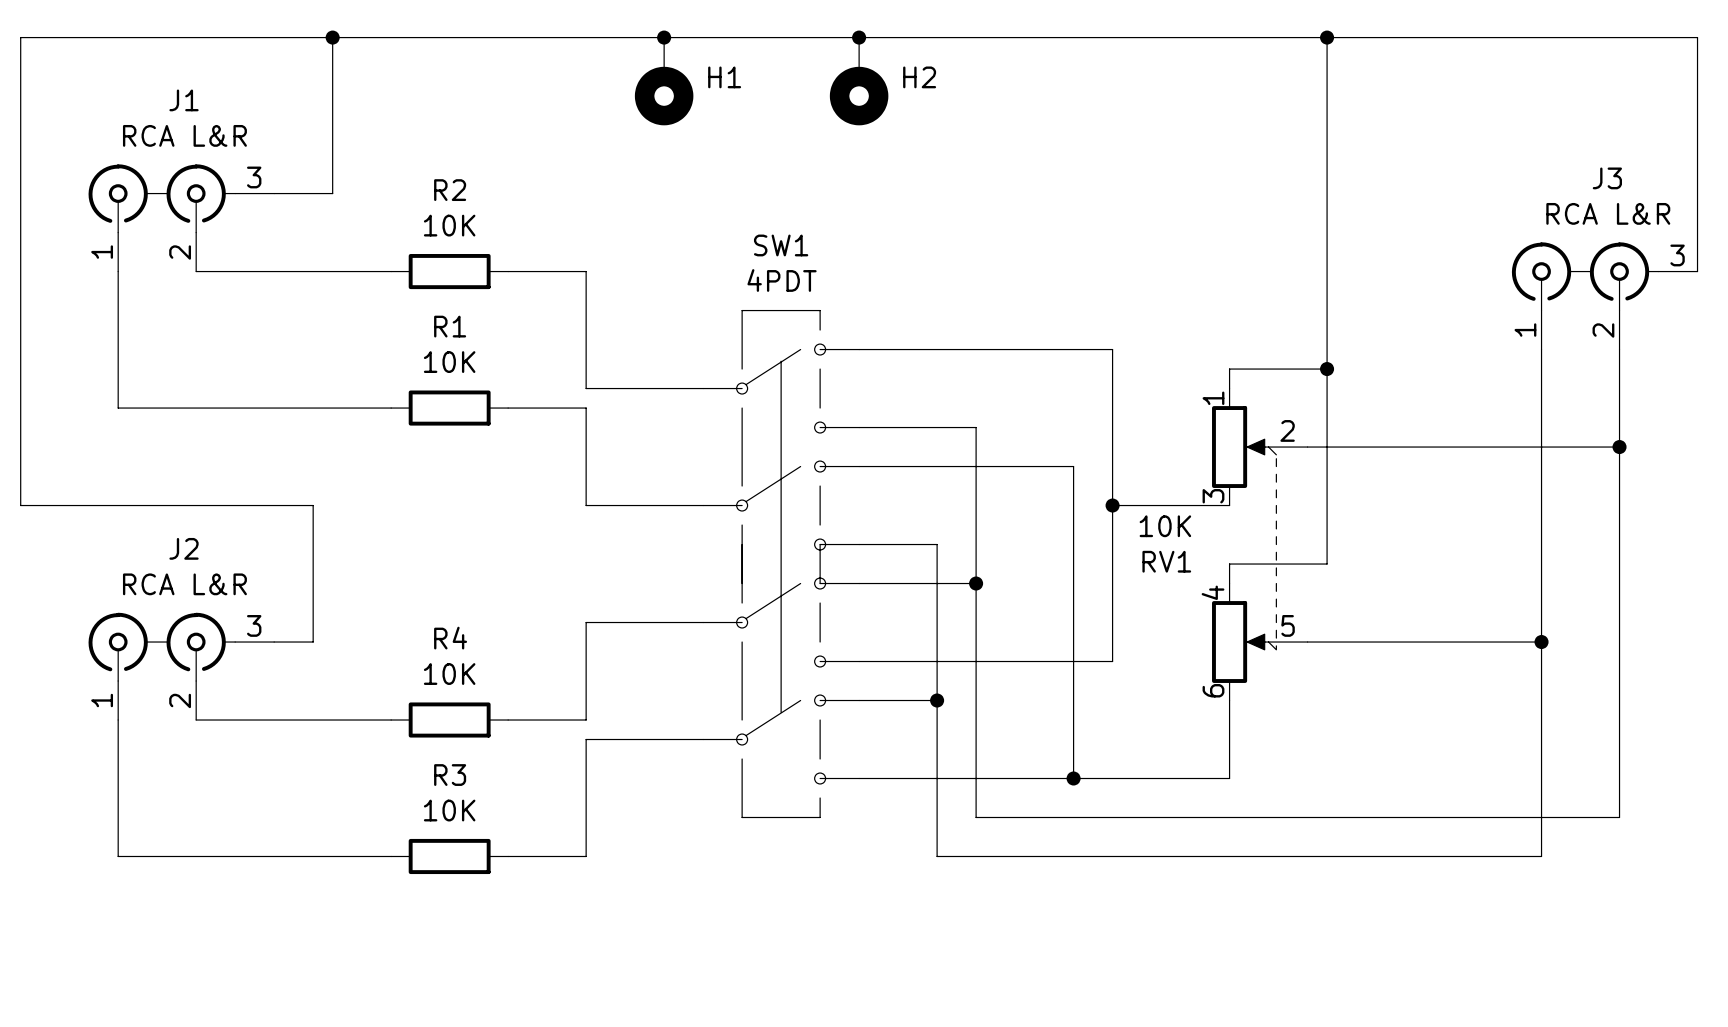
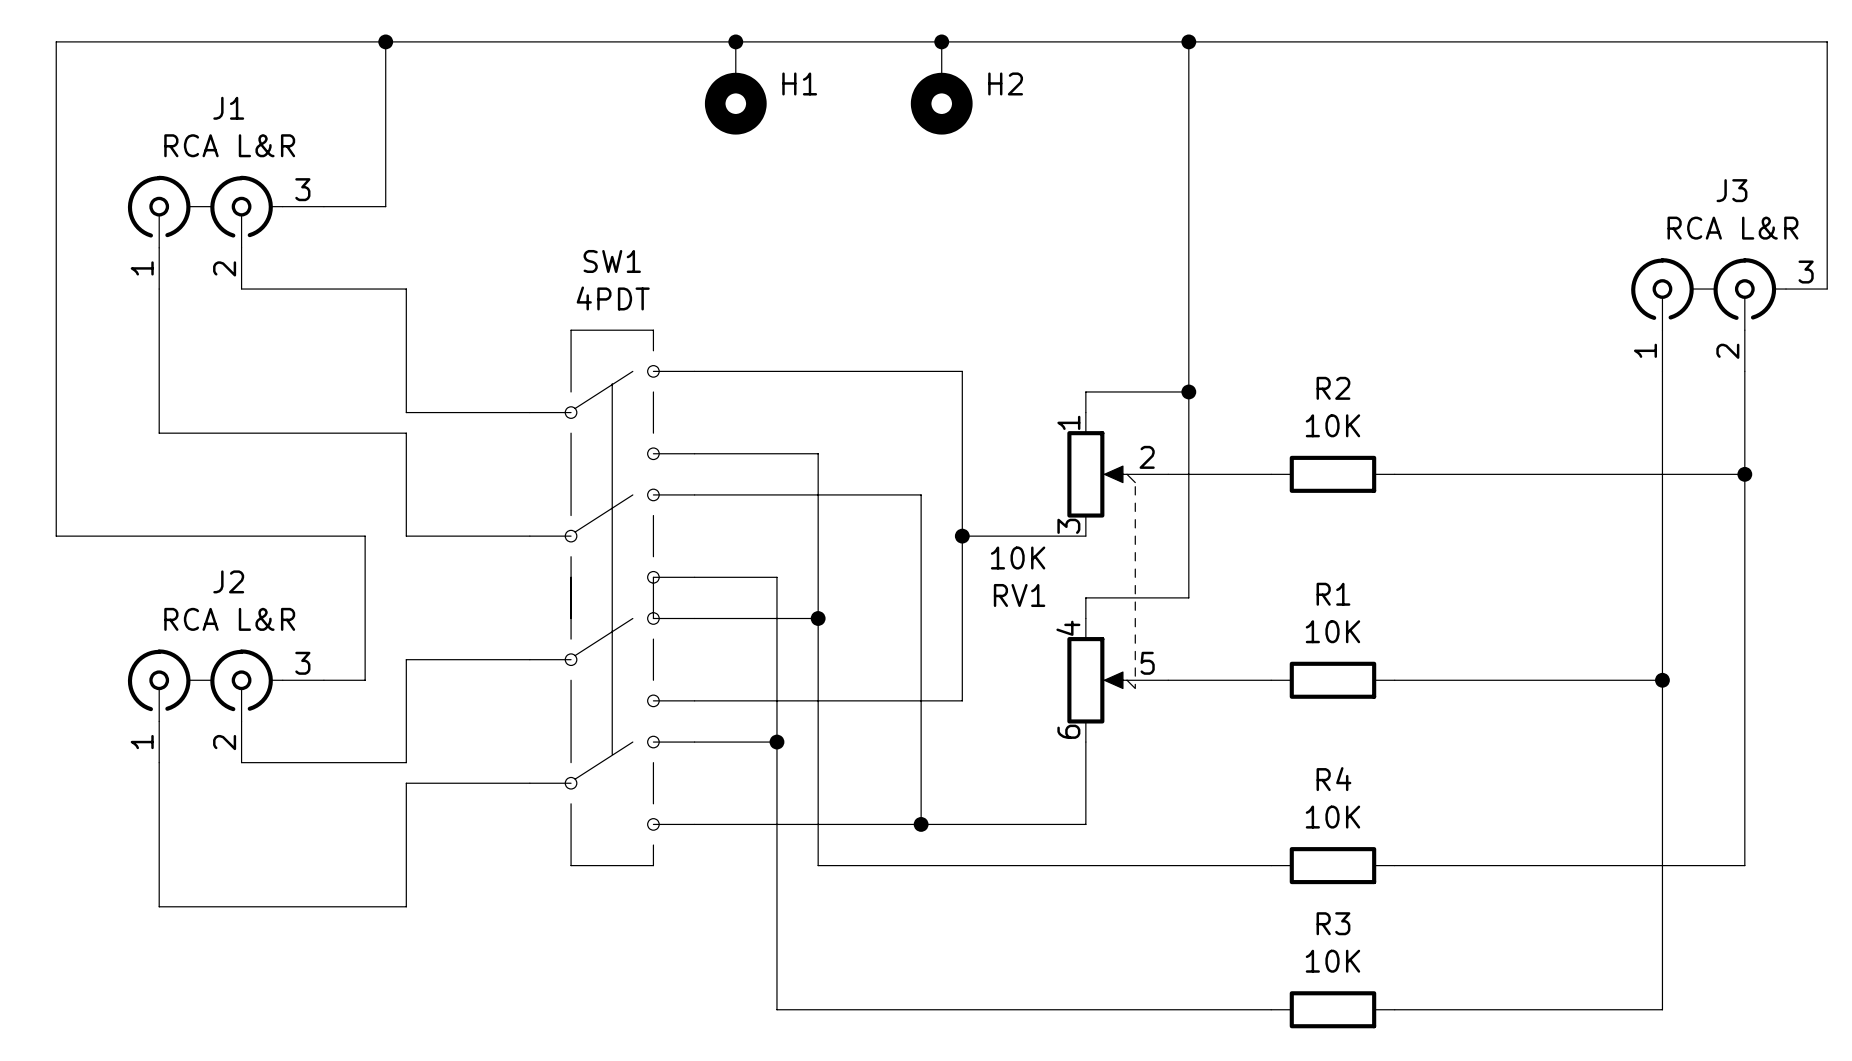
junction: none -> (1188, 41)
wire: (1327, 37) (1327, 564) (1229, 564) (1229, 583) -> (1188, 41) (1188, 597) (1085, 597) (1085, 618)
junction: (1327, 37) -> none
wire: (352, 271) (391, 271) -> (406, 289) (406, 412) (529, 412)
R2 position: (449, 271) -> (1332, 474)
wire: (508, 271) (586, 271) (586, 388) (703, 388) -> none
wire: none -> (694, 371) (941, 371)
wire: (878, 349) (1112, 349) (1112, 661) (878, 661) -> (962, 371) (962, 700)
junction: none -> (1188, 391)
wire: (1327, 369) (1229, 369) (1229, 388) -> (1188, 391) (1085, 391) (1085, 412)
junction: (1327, 369) -> none
wire: (352, 408) (391, 408) -> (406, 433) (406, 536) (529, 536)
R1 position: (449, 408) -> (1332, 680)
wire: (508, 408) (586, 408) (586, 505) (703, 505) -> none
wire: (859, 427) (976, 427) (976, 817) -> (694, 453) (818, 453) (818, 865) (1065, 865)
wire: none -> (1168, 474) (1271, 474)
wire: (859, 466) (1073, 466) (1073, 778) -> (694, 494) (921, 494) (921, 824)
junction: none -> (962, 536)
wire: (1112, 505) (1229, 505) -> (962, 536) (1085, 536)
junction: (1112, 505) -> none
wire: none -> (694, 577) (776, 577) (776, 1009) (1271, 1009)
wire: (859, 544) (937, 544) (937, 856) (1541, 856) -> (1394, 1009) (1662, 1009) (1662, 906)
RV1 position: (1259, 544) -> (1117, 577)
SW1 position: (781, 564) -> (612, 597)
junction: none -> (818, 618)
wire: (859, 583) (976, 583) -> (694, 618) (818, 618)
junction: (976, 583) -> none
wire: (703, 622) (586, 622) (586, 720) (508, 720) -> none
wire: none -> (1168, 680) (1271, 680)
wire: none -> (694, 700) (941, 700)
junction: none -> (776, 742)
wire: (859, 700) (937, 700) -> (694, 742) (776, 742)
junction: (937, 700) -> none
wire: (1229, 700) (1229, 778) (995, 778) -> (1085, 742) (1085, 824)
wire: (352, 720) (391, 720) -> (406, 762) (406, 659) (529, 659)
R4 position: (449, 720) -> (1332, 865)
wire: (703, 739) (586, 739) (586, 856) (508, 856) -> none
wire: none -> (694, 824) (941, 824)
junction: none -> (921, 824)
junction: (1073, 778) -> none
wire: (1171, 817) (1288, 817) -> none
wire: (352, 856) (391, 856) -> (406, 906) (406, 783) (529, 783)
R3 position: (449, 856) -> (1332, 1009)

